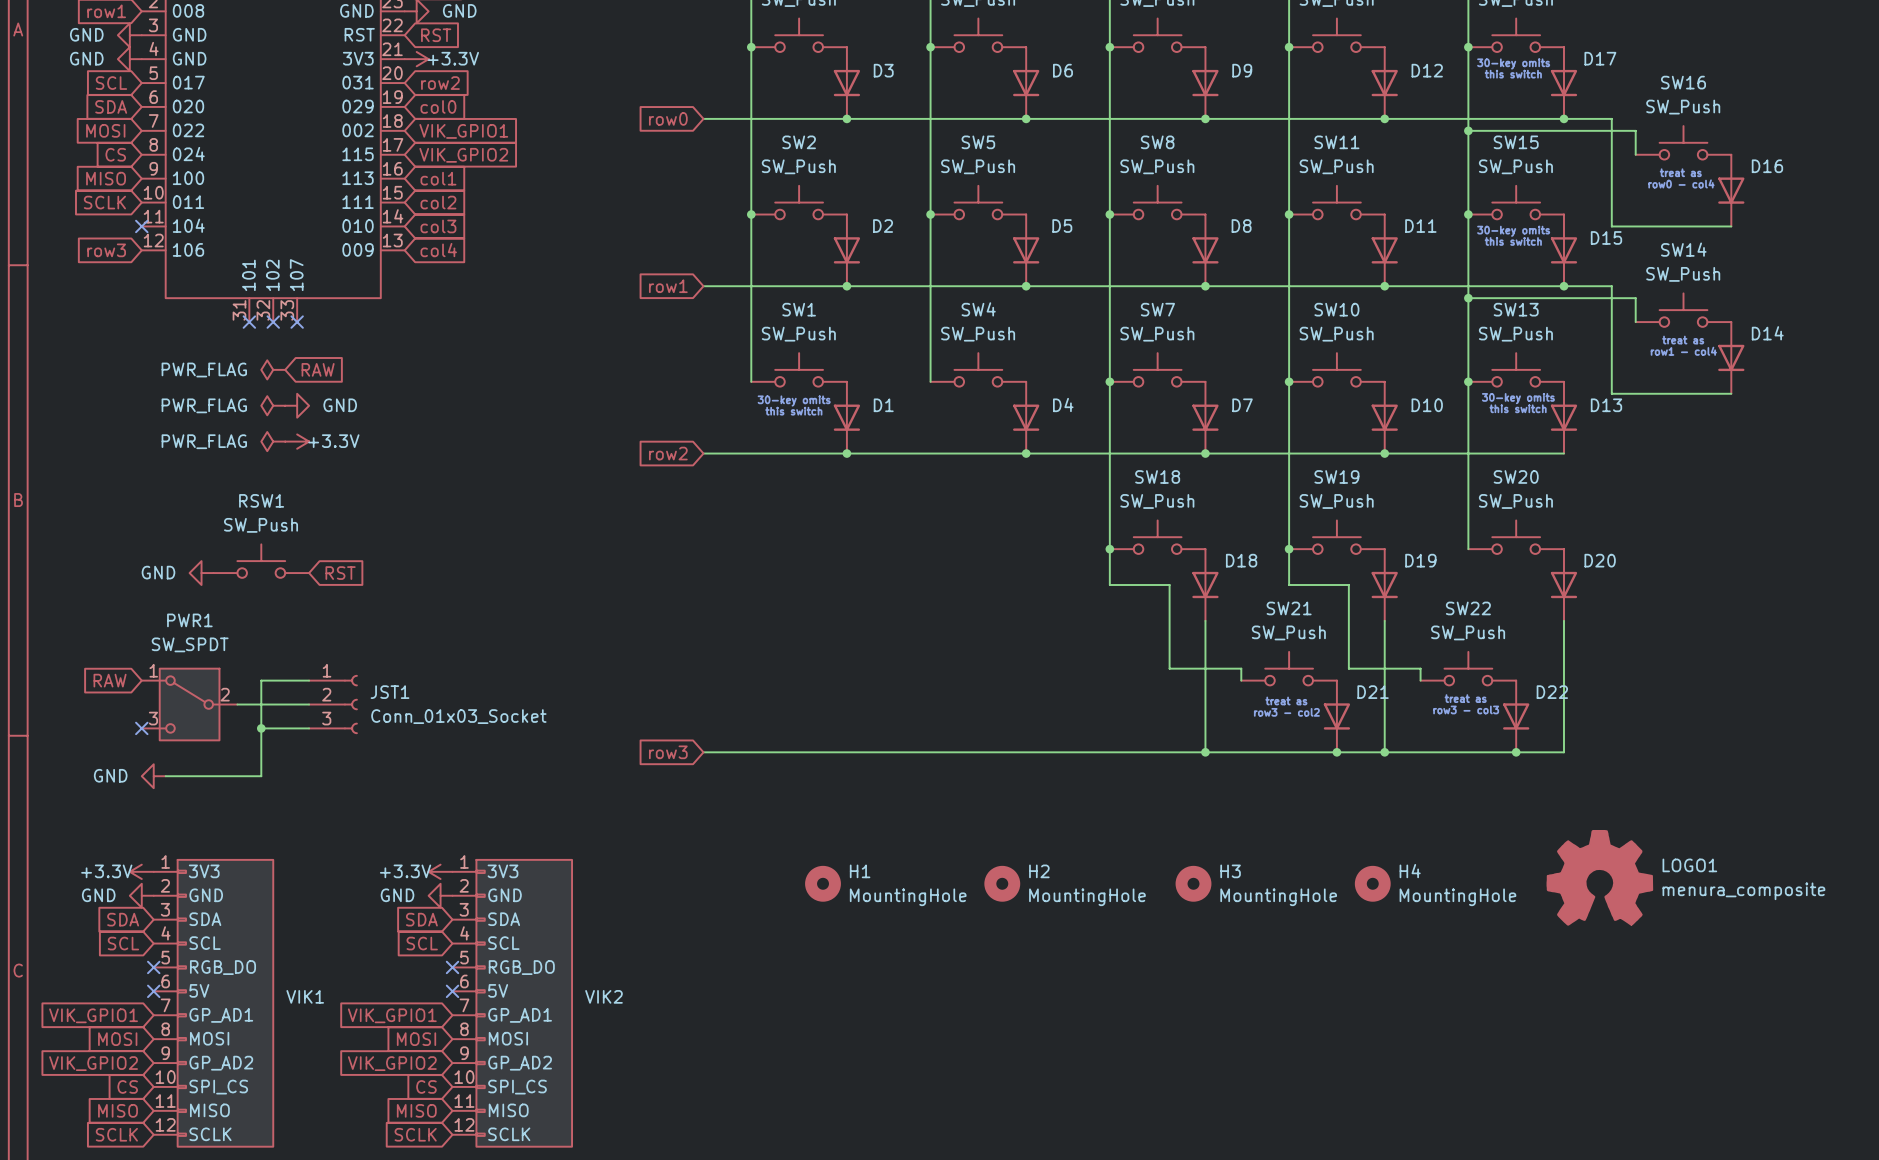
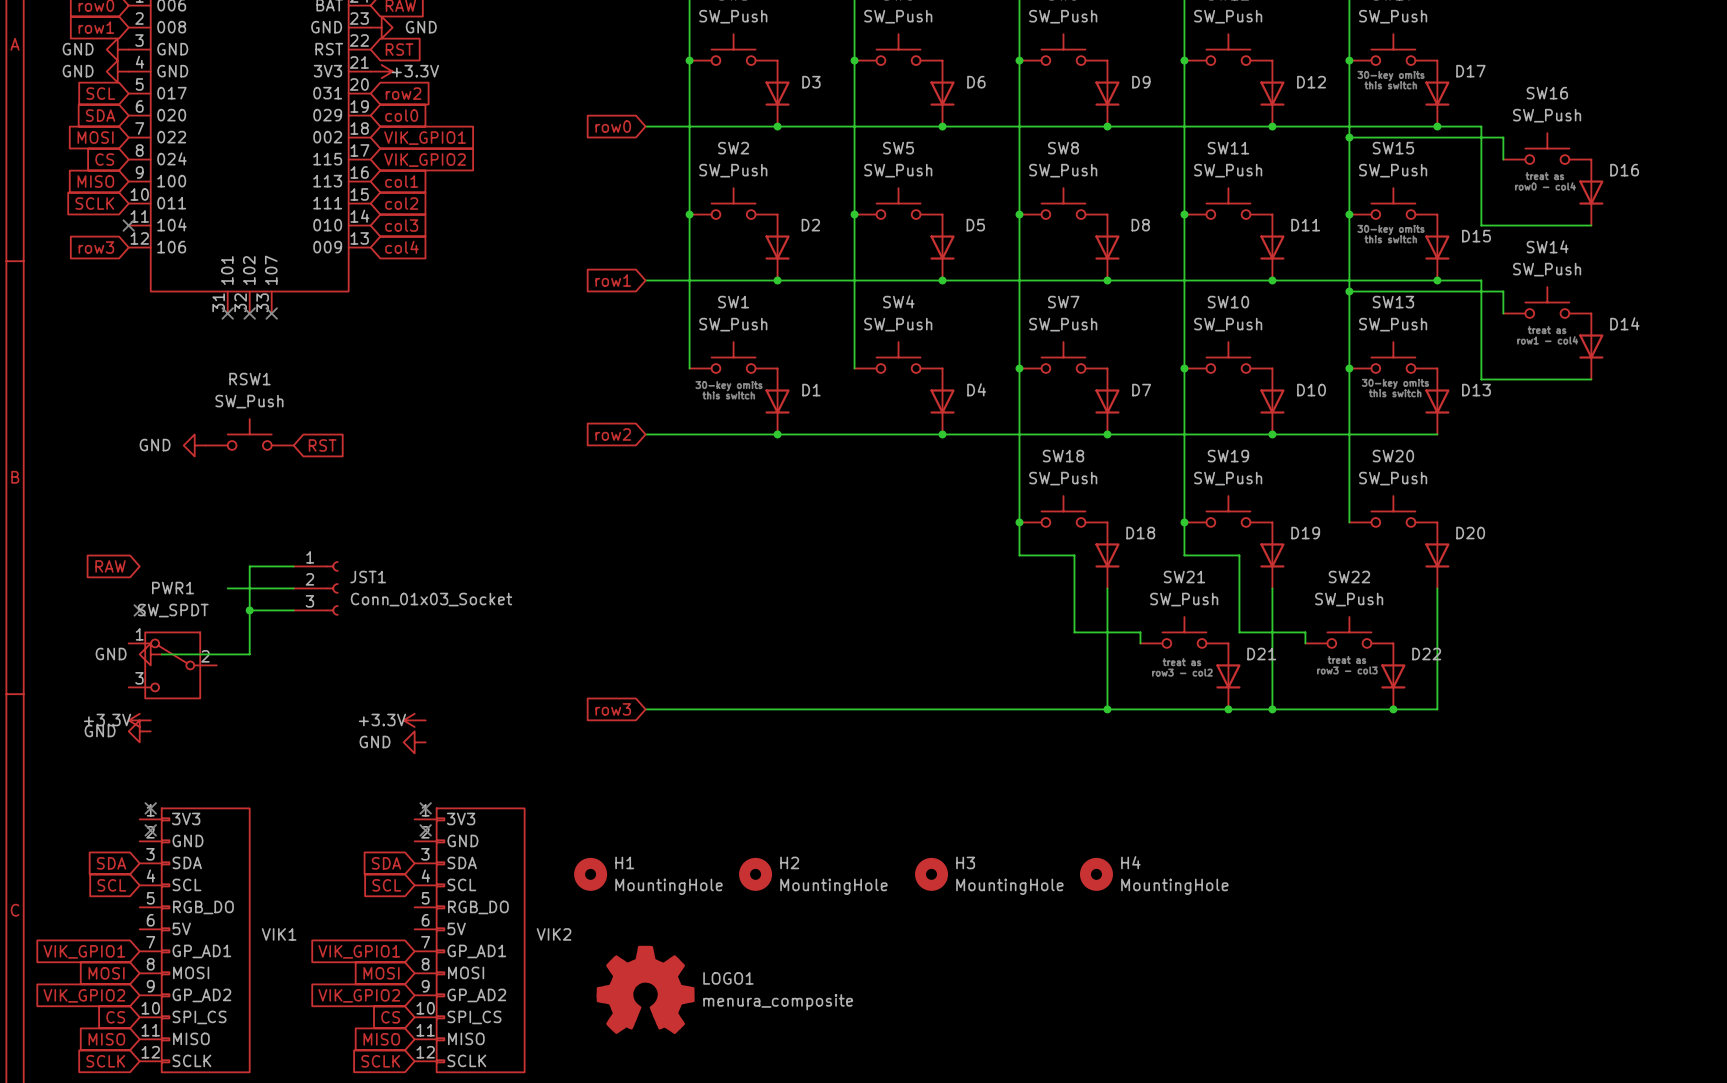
power symbol: PWR_FLAG (273, 369) -> none
global label: RAW (318, 369) -> none
power symbol: PWR_FLAG (273, 405) -> none
power symbol: GND (297, 405) -> none
power symbol: PWR_FLAG (273, 441) -> none
power symbol: +3.3V (297, 441) -> none
power symbol: none -> GND (194, 445)
RSW1 position: (261, 561) -> (249, 434)
power symbol: GND (201, 573) -> none
global label position: RST (340, 573) -> RST (322, 445)
no-connect mark: none -> (139, 610)
junction: none -> (249, 610)
global label position: RAW (110, 680) -> RAW (110, 566)
wire: (309, 680) (261, 680) (261, 776) (165, 776) -> (293, 566) (249, 566) (249, 654) (161, 654)
power symbol: none -> GND (150, 654)
wire: (237, 704) (309, 704) -> (227, 588) (293, 588)
JST1 position: (333, 704) -> (316, 588)
no-connect mark: (141, 728) -> none
wire: (261, 728) (309, 728) -> (249, 610) (293, 610)
junction: (261, 728) -> none
no-connect mark: none -> (150, 808)
no-connect mark: none -> (425, 808)
power symbol position: +3.3V (141, 871) -> +3.3V (139, 720)
power symbol position: +3.3V (440, 871) -> +3.3V (414, 720)
LOGO1 position: (1599, 877) -> (645, 989)
no-connect mark: none -> (150, 830)
no-connect mark: none -> (425, 830)
H1 position: (823, 883) -> (590, 874)
H2 position: (1002, 883) -> (755, 874)
H3 position: (1193, 883) -> (931, 874)
H4 position: (1372, 883) -> (1096, 874)
power symbol: GND (141, 895) -> none
power symbol position: GND (440, 895) -> GND (414, 742)
no-connect mark: (153, 967) -> none
no-connect mark: (452, 967) -> none
no-connect mark: (153, 991) -> none
no-connect mark: (452, 991) -> none

